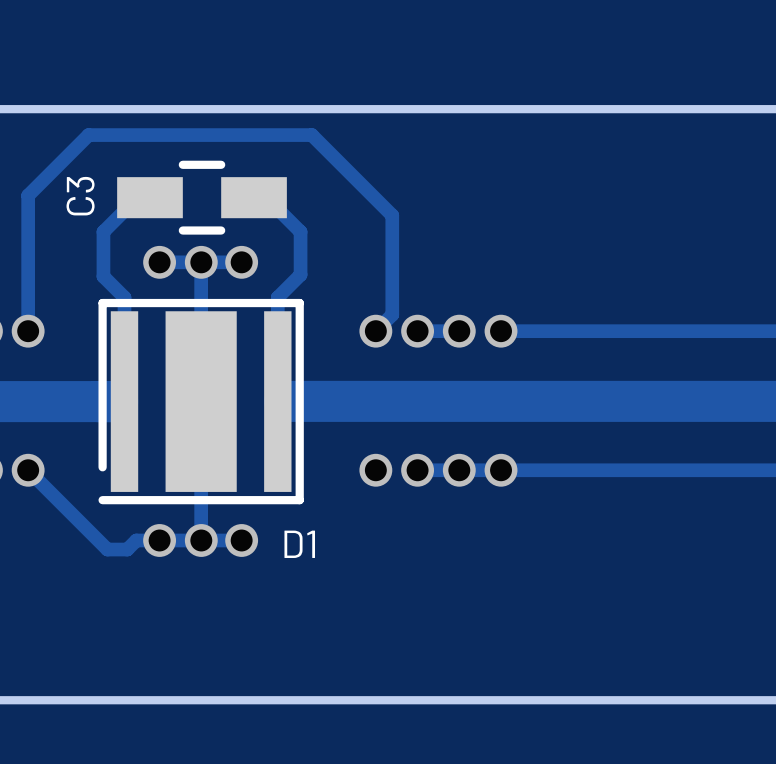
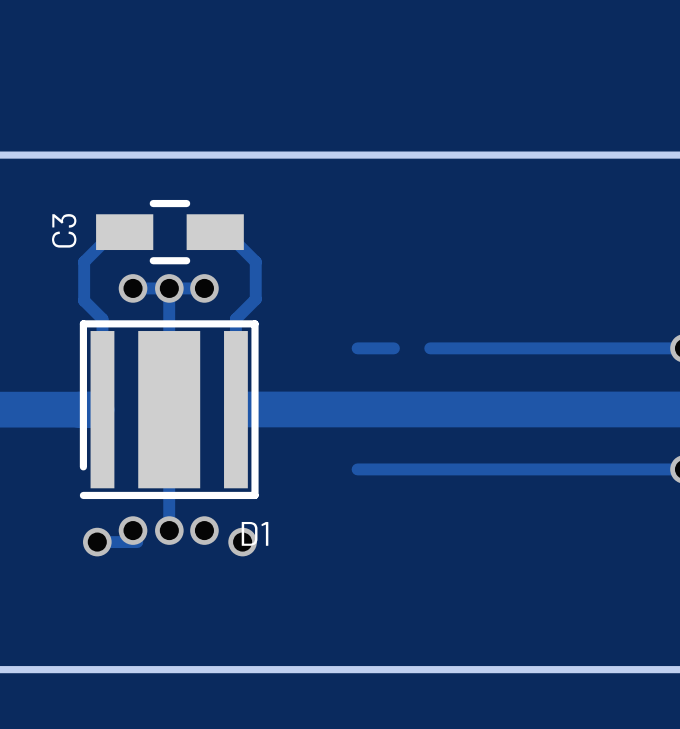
track: (28, 331) (28, 195) (88, 135) (311, 135) (392, 215) (392, 314) (375, 331) -> none
via: (28, 331) -> none
via: (375, 331) -> none
via: (417, 331) -> none
via: (459, 331) -> none
via: (501, 331) -> none
track: (28, 470) (107, 549) (127, 549) (136, 540) (241, 540) -> none
via: (28, 470) -> none
via: (375, 470) -> none
via: (417, 470) -> none
via: (459, 470) -> none
via: (501, 470) -> none
via: none -> (97, 542)
track: none -> (104, 542) (137, 542)
via: none -> (242, 542)

